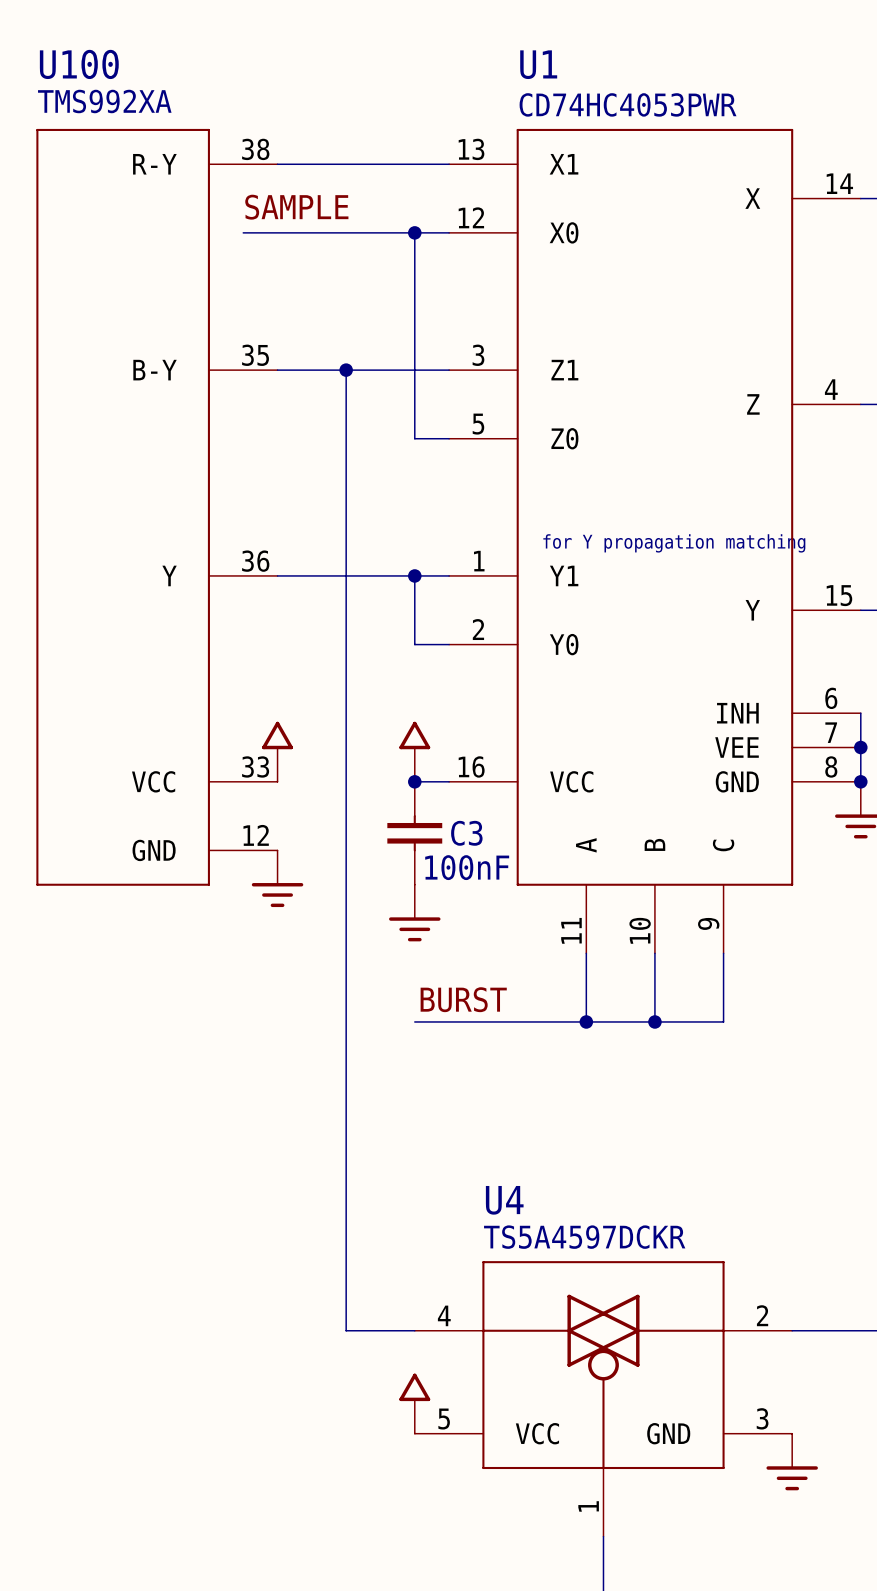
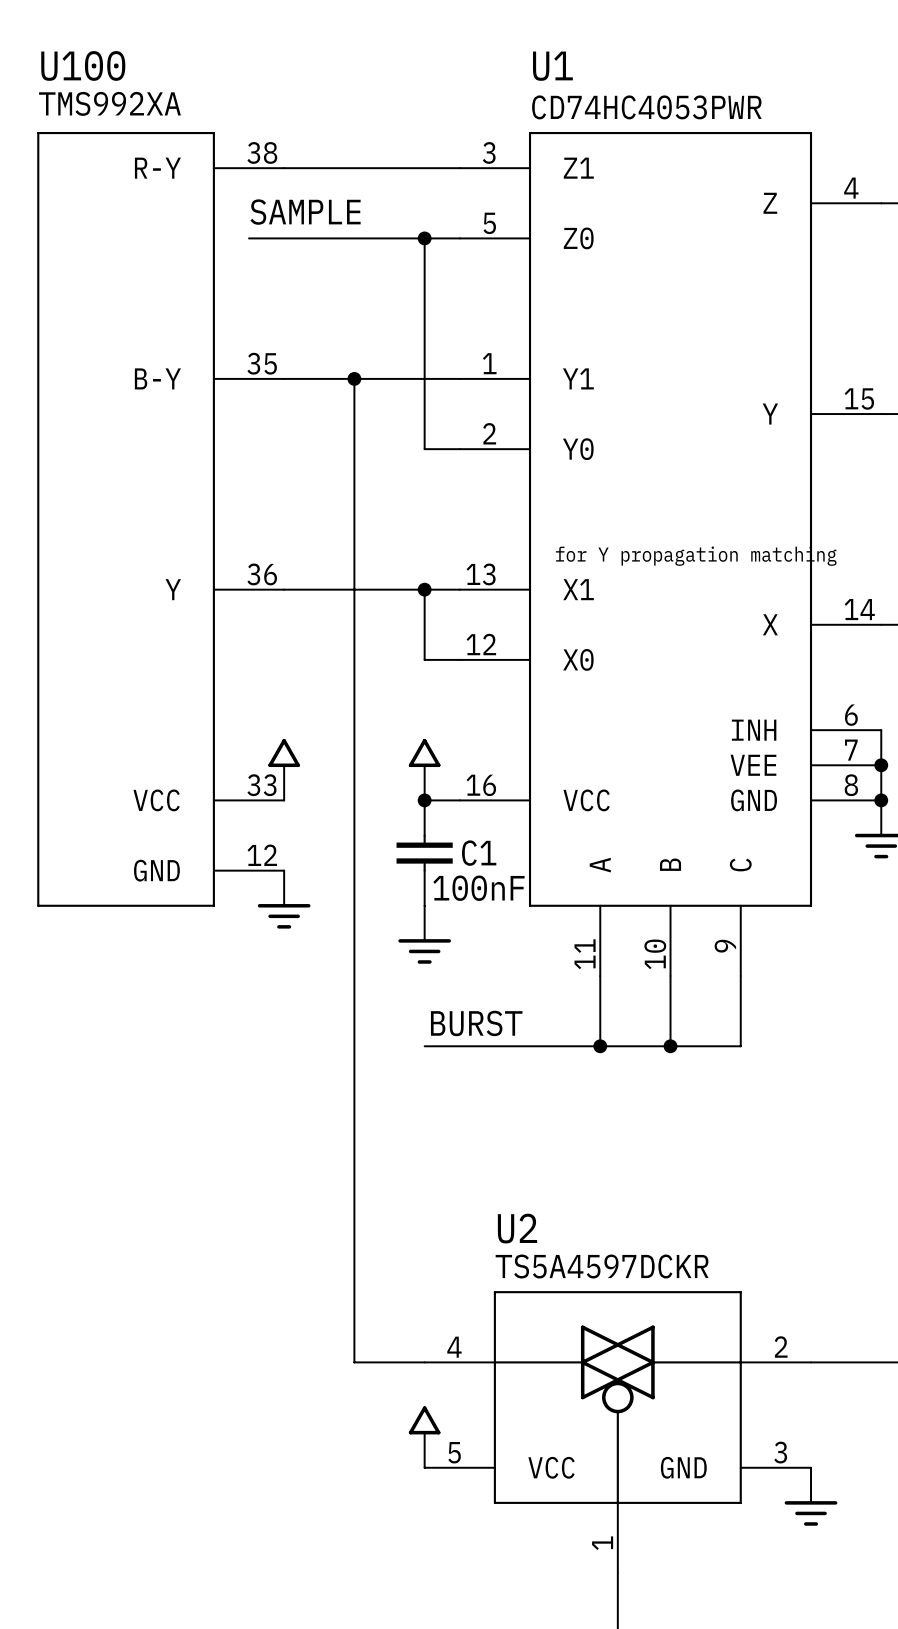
U1 symbol: [449, 128, 861, 954] -> [459, 131, 882, 977]
C3 name: C3 (466, 833) -> C1 (479, 853)
U4 name: U4 (504, 1200) -> U2 (517, 1228)

